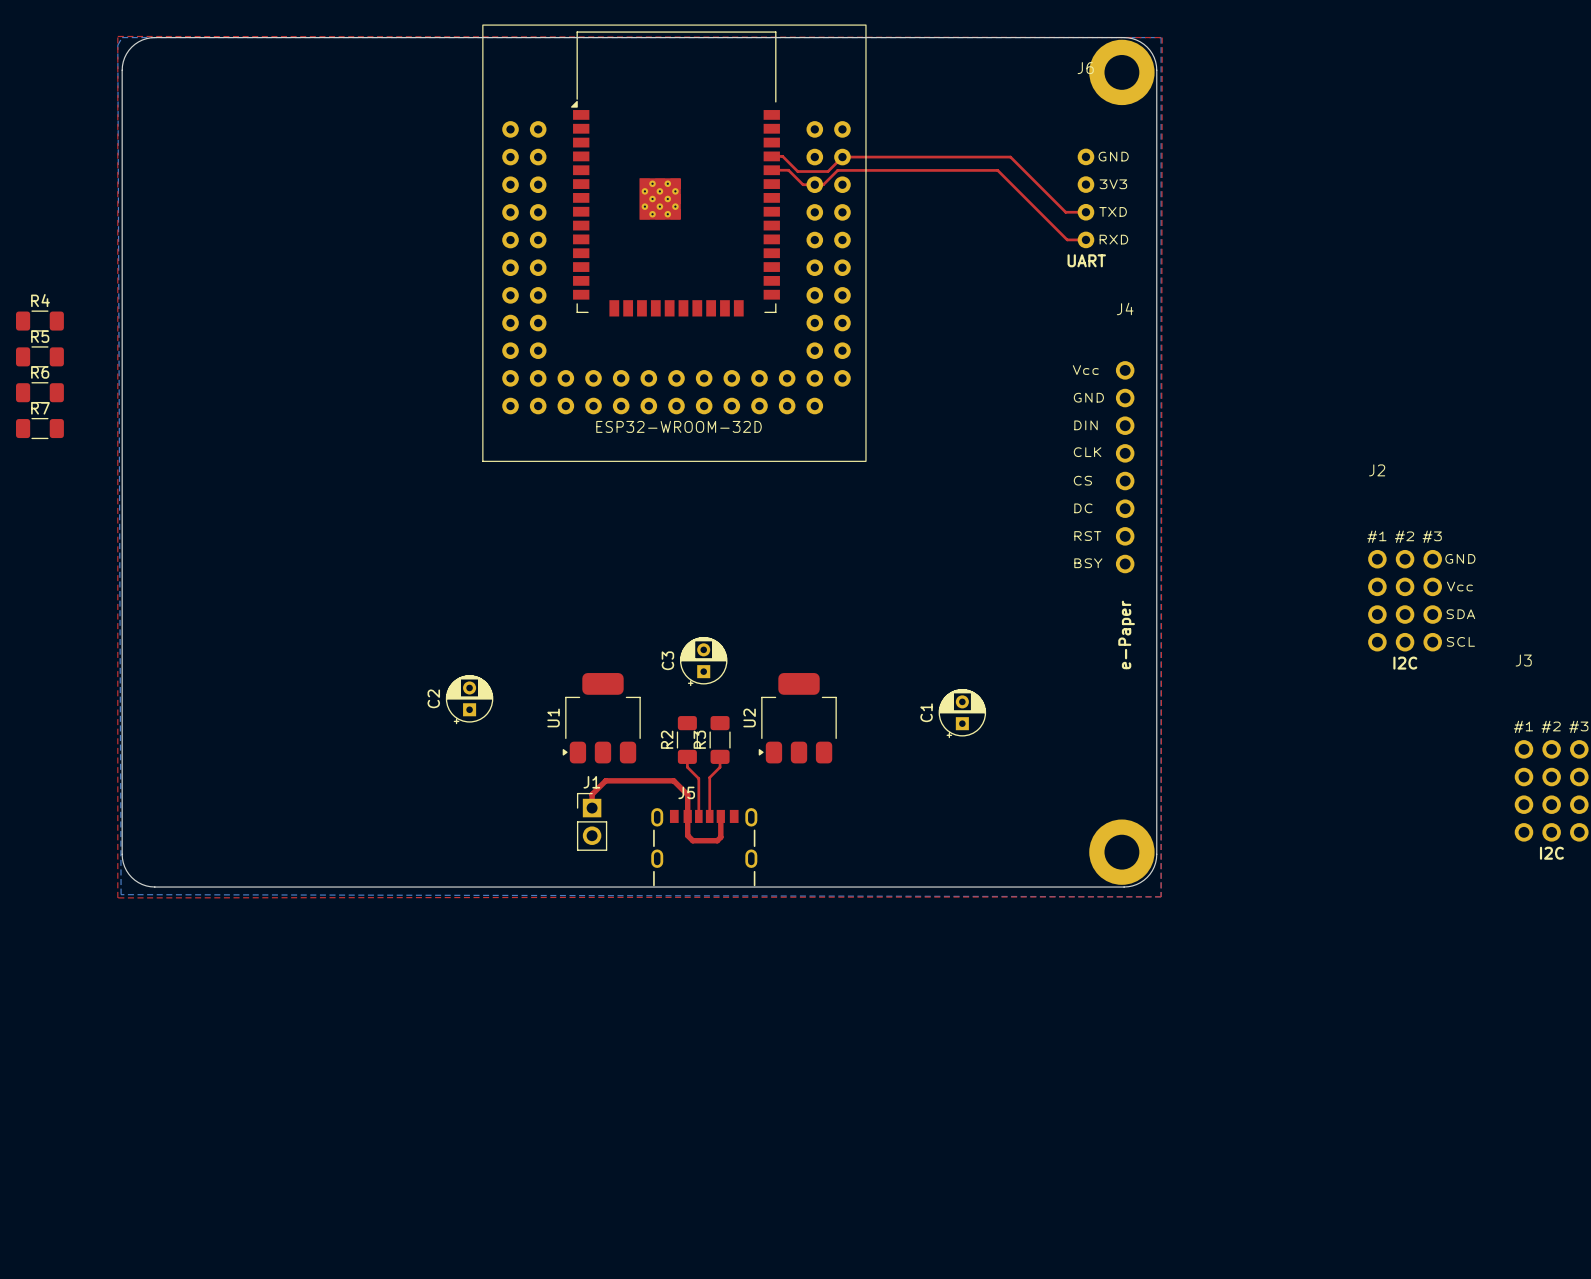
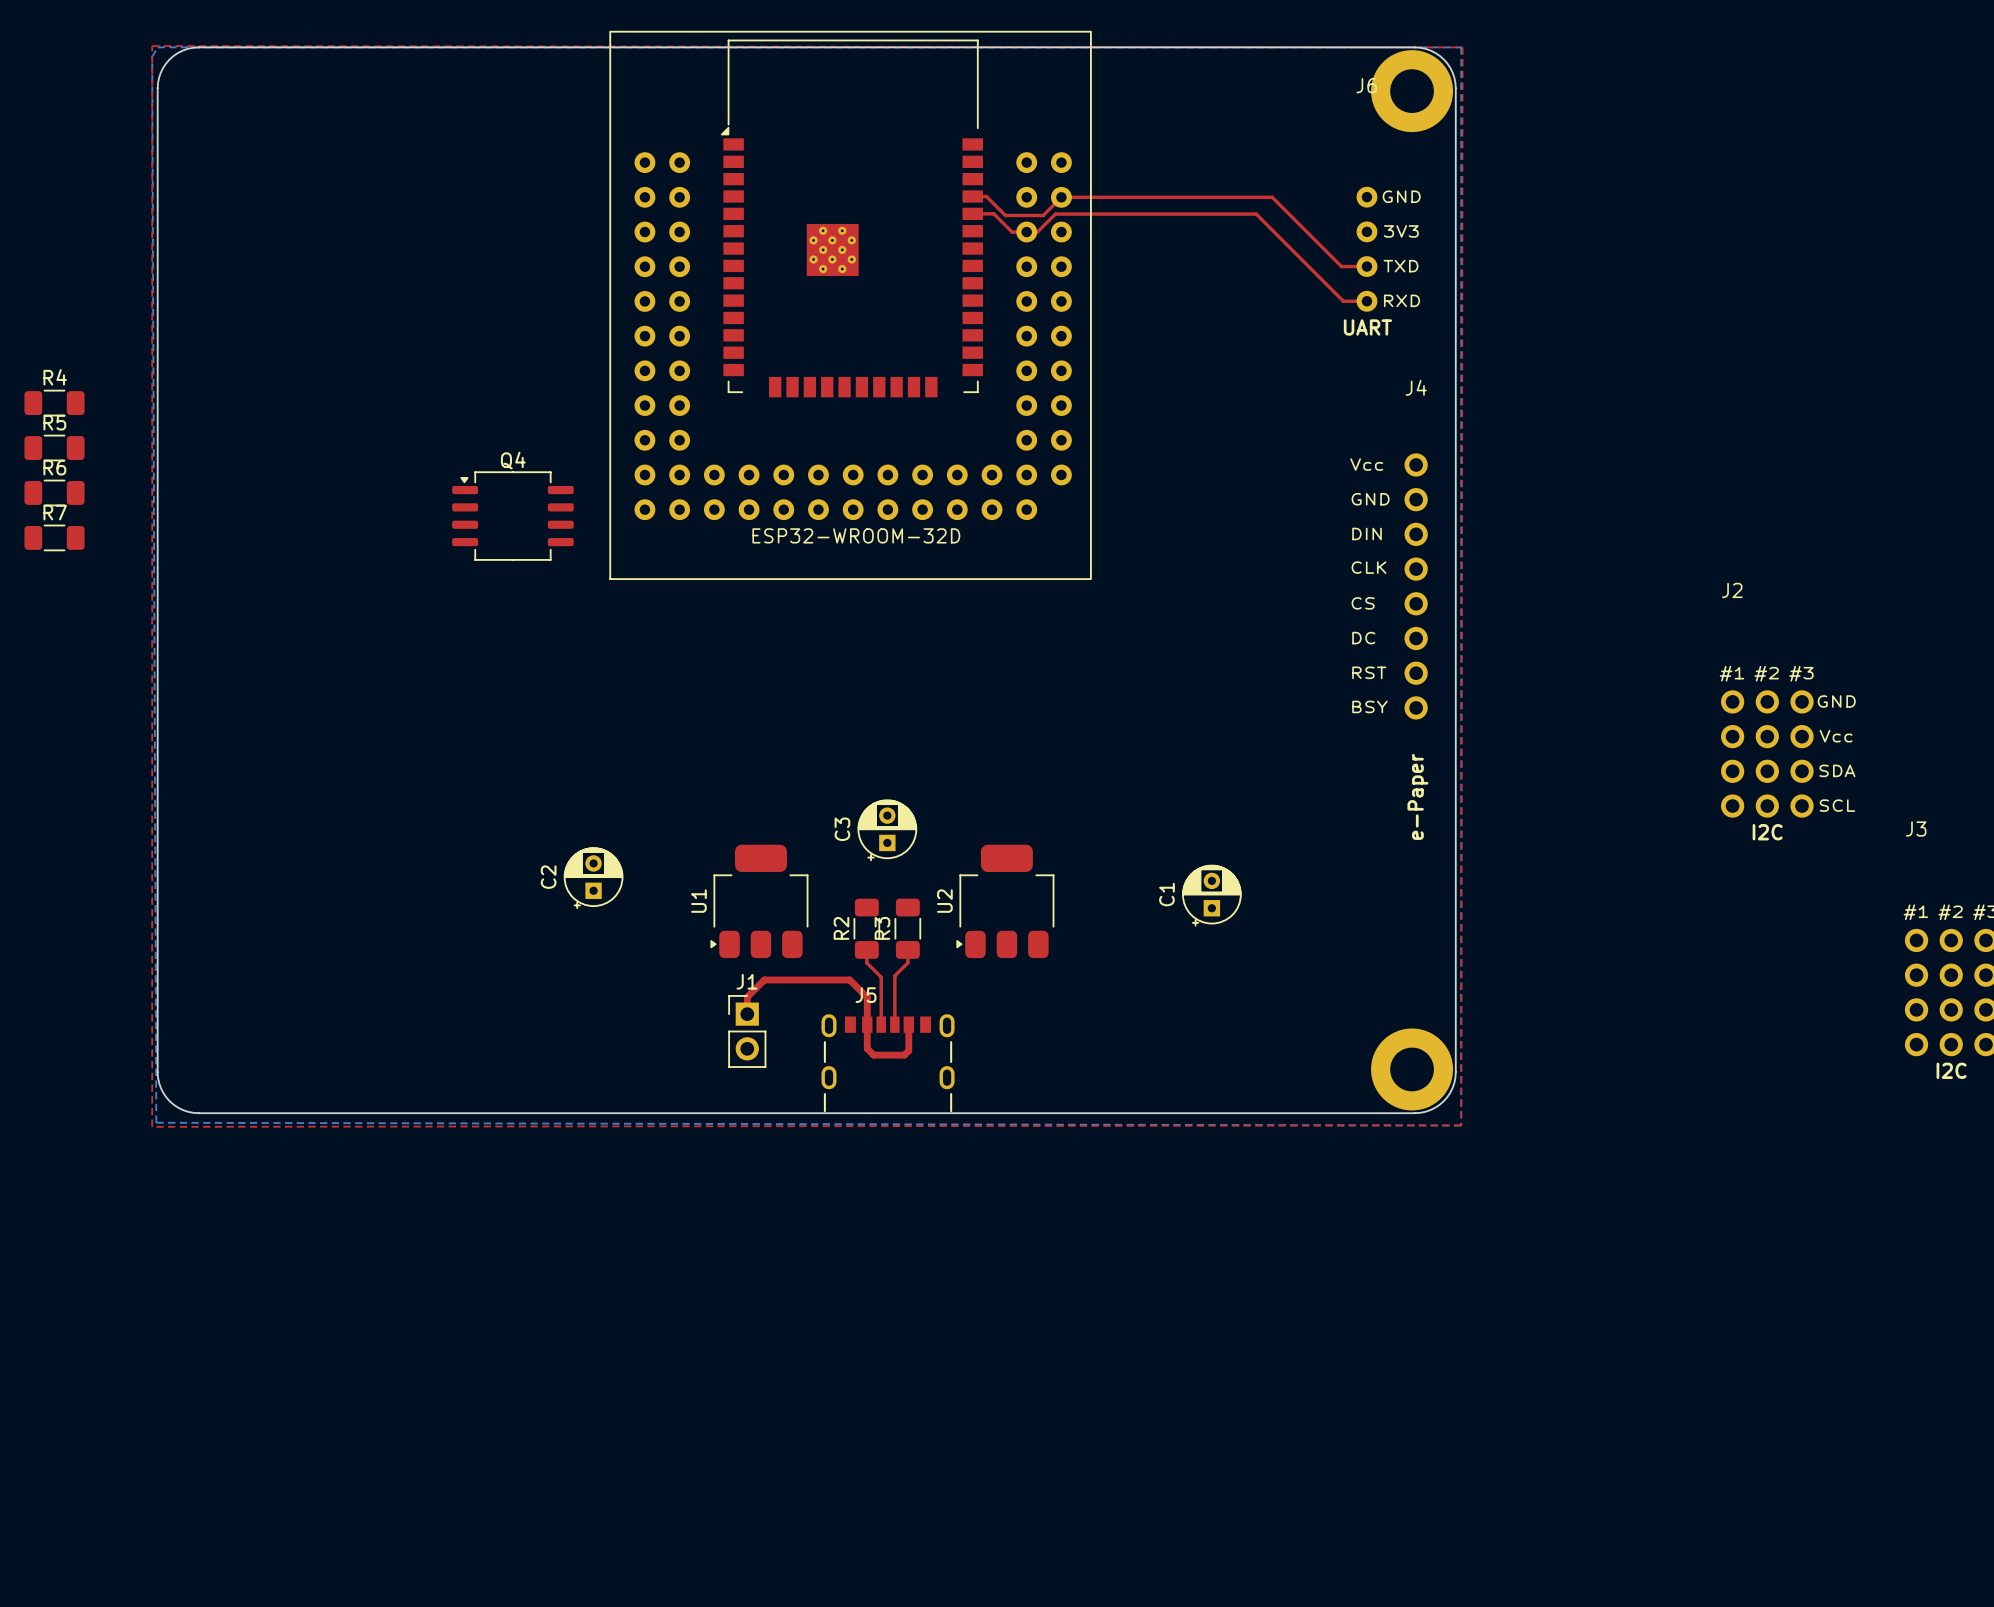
Q4: none -> (512, 516)

